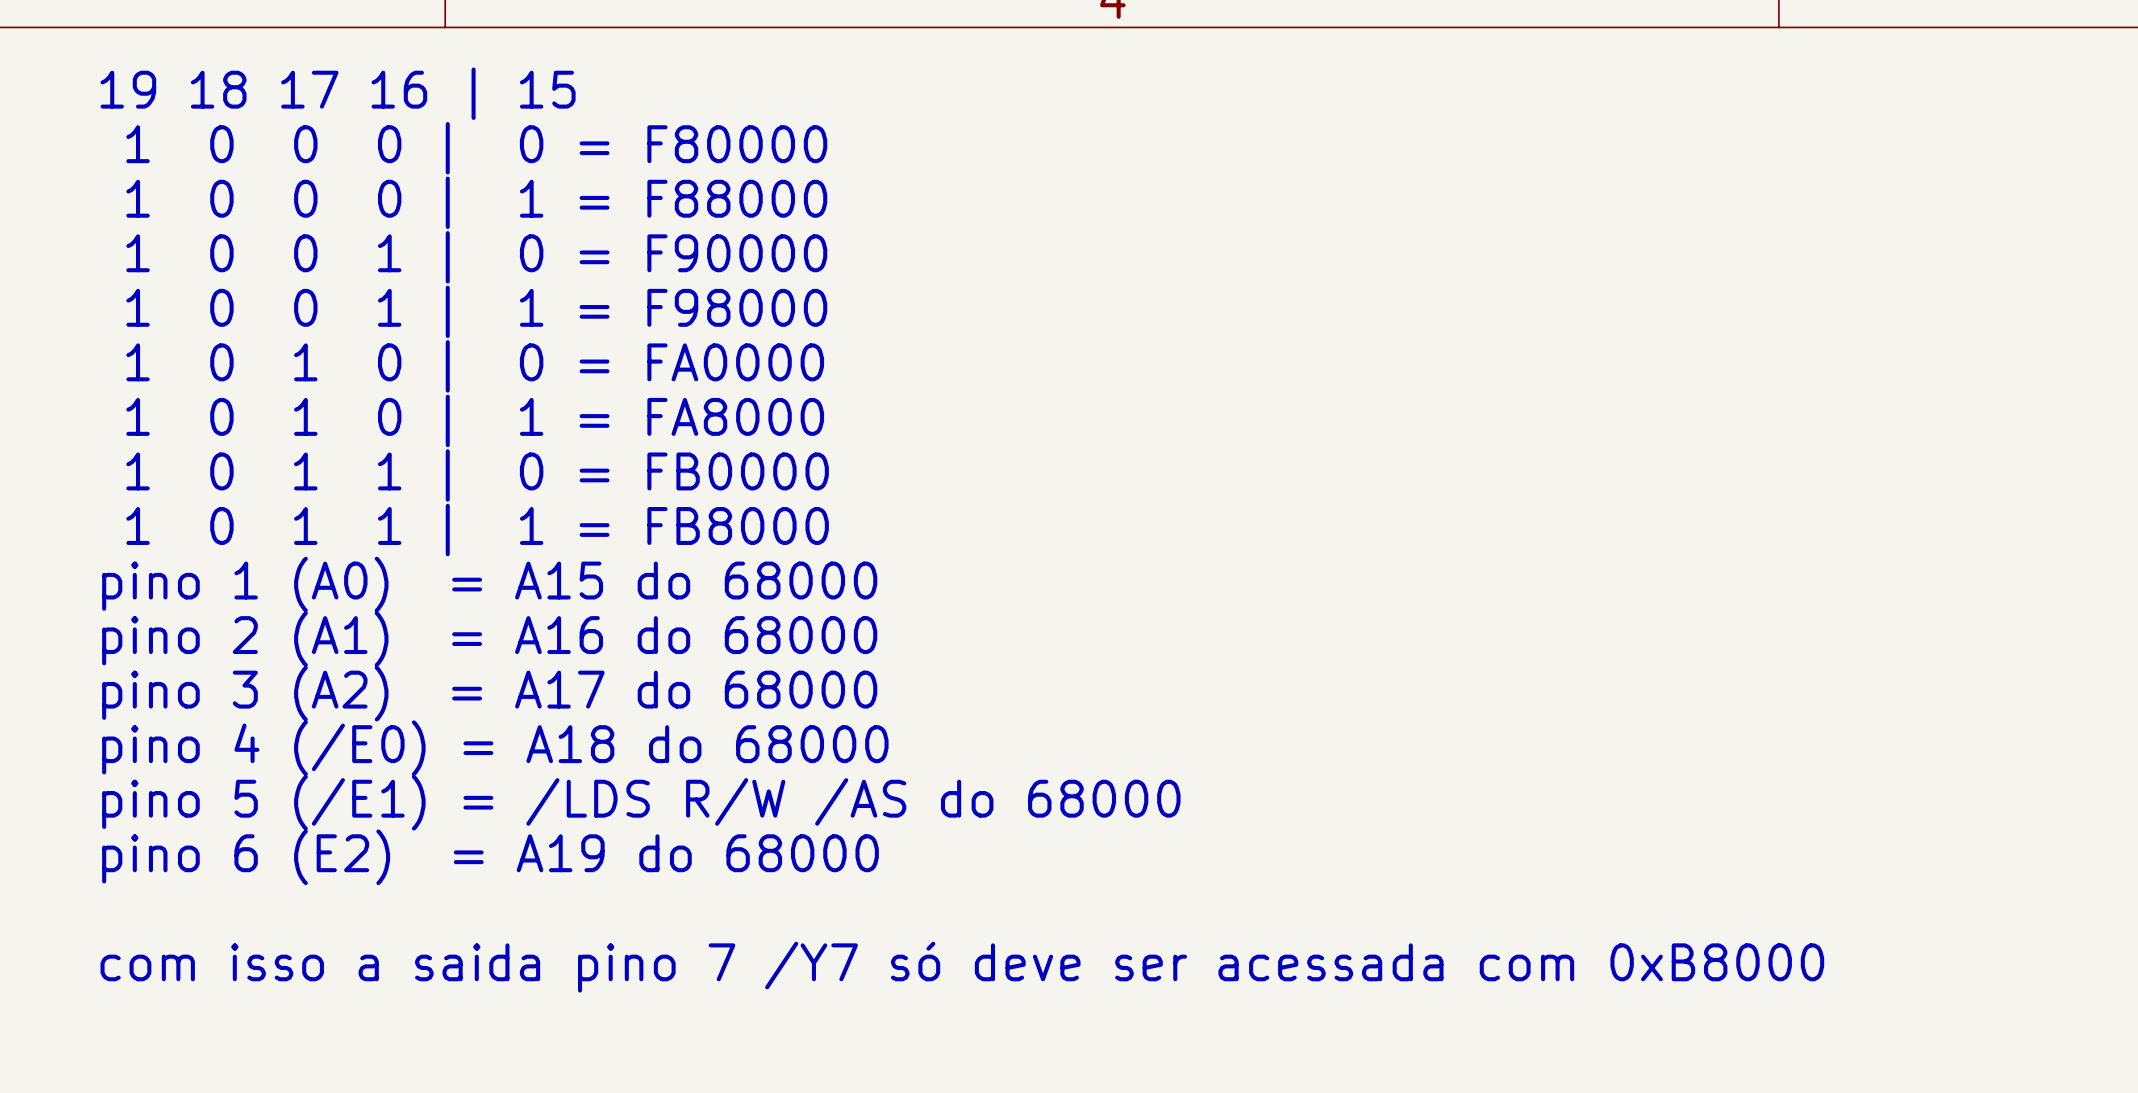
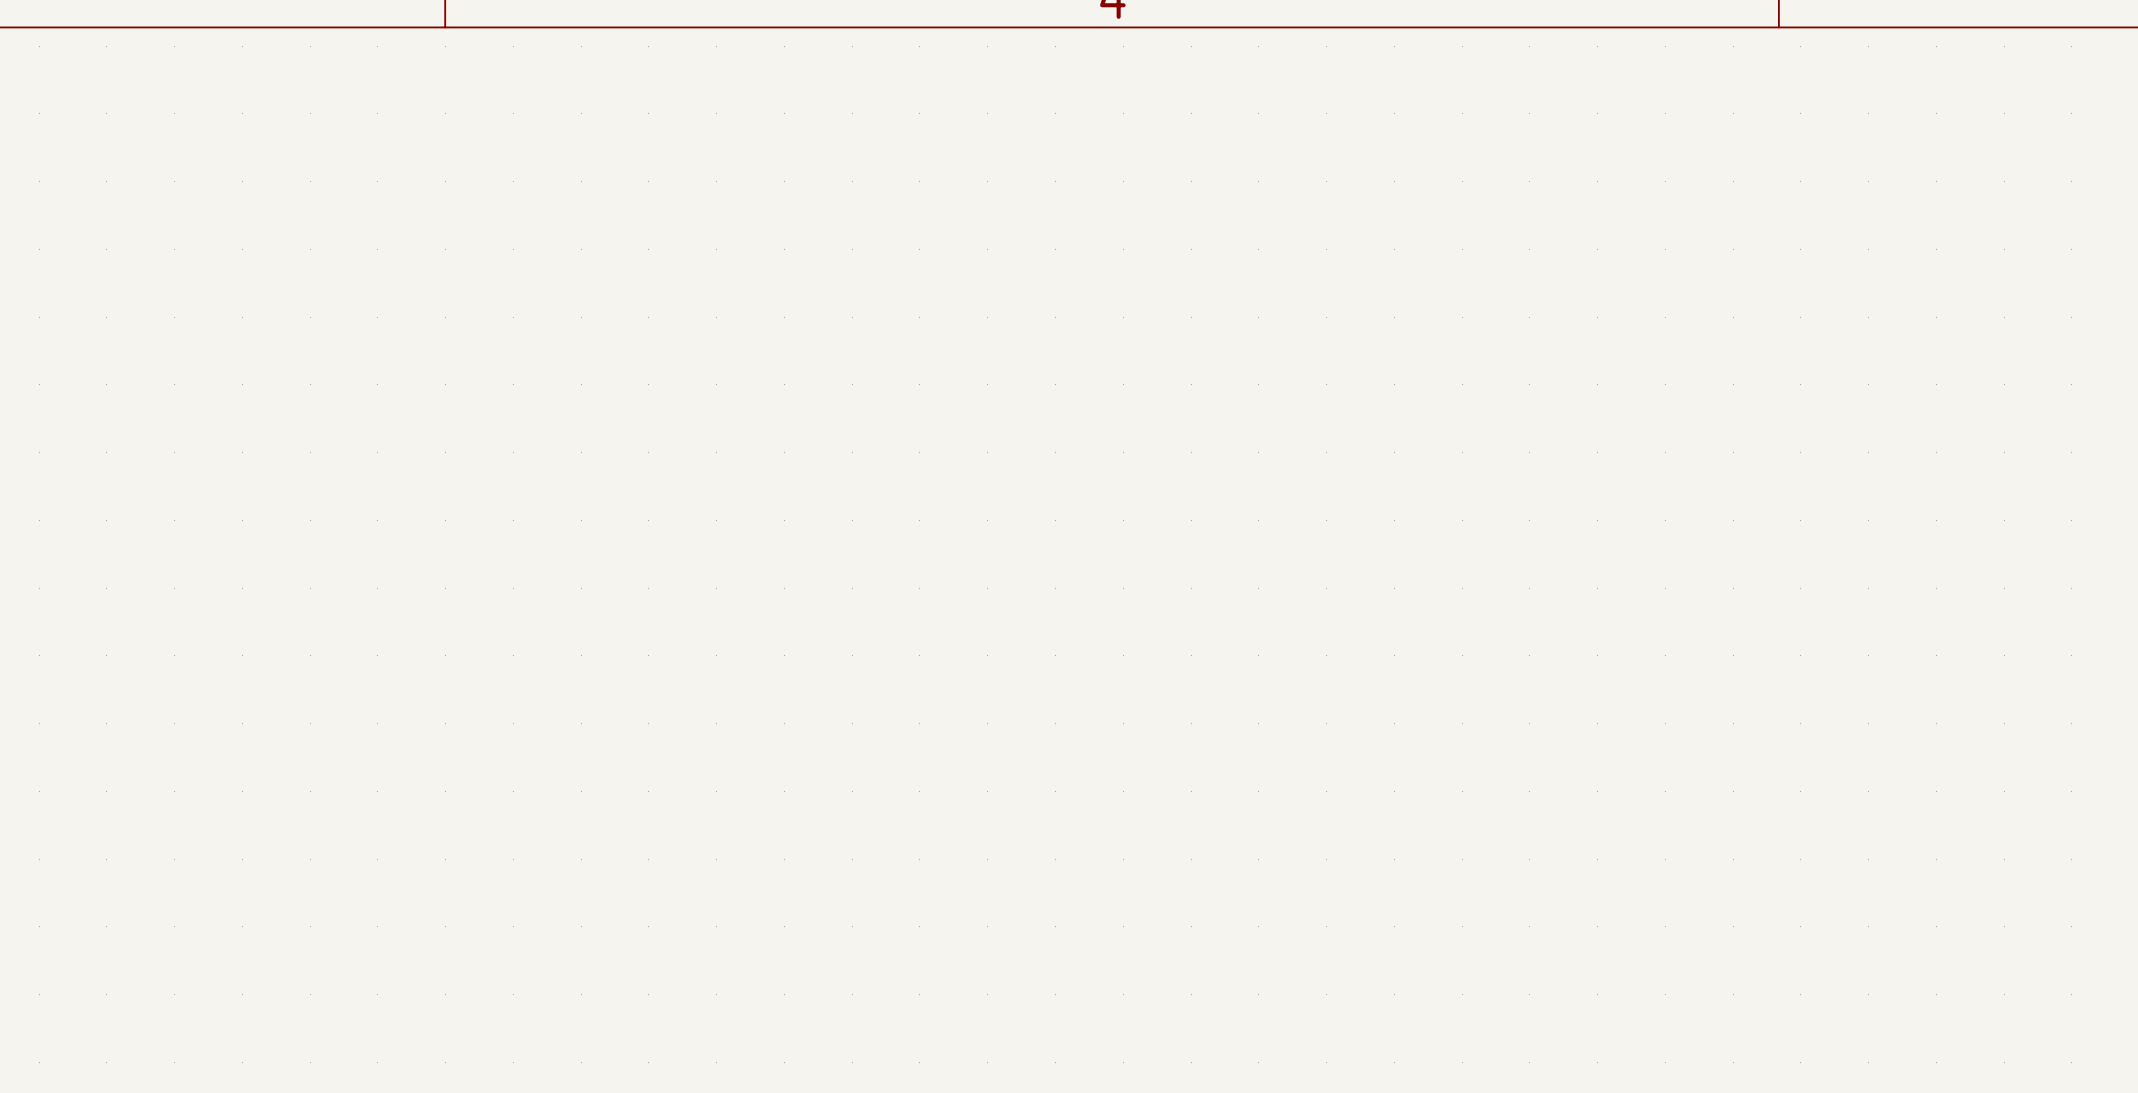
text: 19 18 17 16 | 15 (338, 93) -> none
text: 1 0 0 0 | 0 = F80000 (476, 148) -> none
text: 1 0 0 0 | 1 = F88000 (476, 202) -> none
text: 1 0 0 1 | 0 = F90000 (476, 257) -> none
text: 1 0 0 1 | 1 = F98000 (476, 311) -> none
text: 1 0 1 0 | 0 = FA0000 (475, 366) -> none
text: 1 0 1 0 | 1 = FA8000 (475, 420) -> none
text: 1 0 1 1 | 0 = FB0000 (477, 475) -> none
text: 1 0 1 1 | 1 = FB8000 (477, 530) -> none
text: pino 1 (A0) = A15 do 68000 (489, 584) -> none
text: pino 2 (A1) = A16 do 68000 (489, 639) -> none
text: pino 3 (A2) = A17 do 68000 (489, 693) -> none
text: pino 4 (/E0) = A18 do 68000 (495, 748) -> none
text: pino 5 (/E1) = /LDS R/W /AS do 68000 (641, 802) -> none
text: pino 6 (E2) = A19 do 68000 (490, 857) -> none
text: com isso a saida pino 7 /Y7 só deve ser acessada com 0xB8000 (962, 967) -> none

